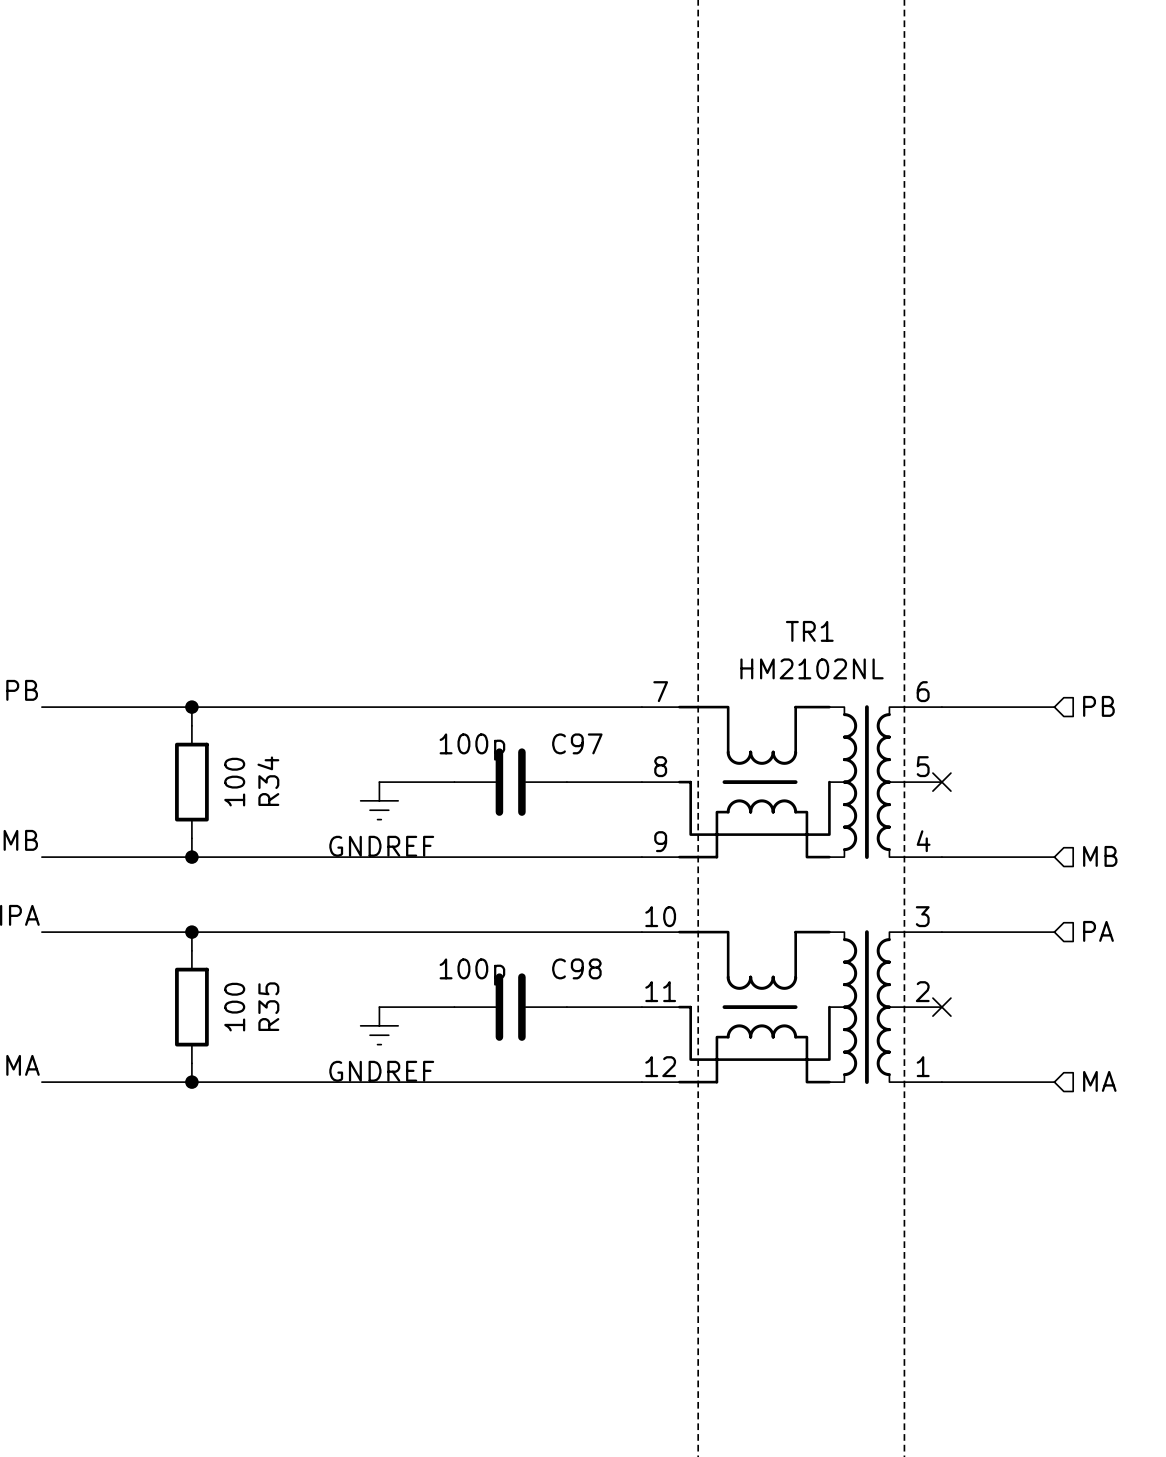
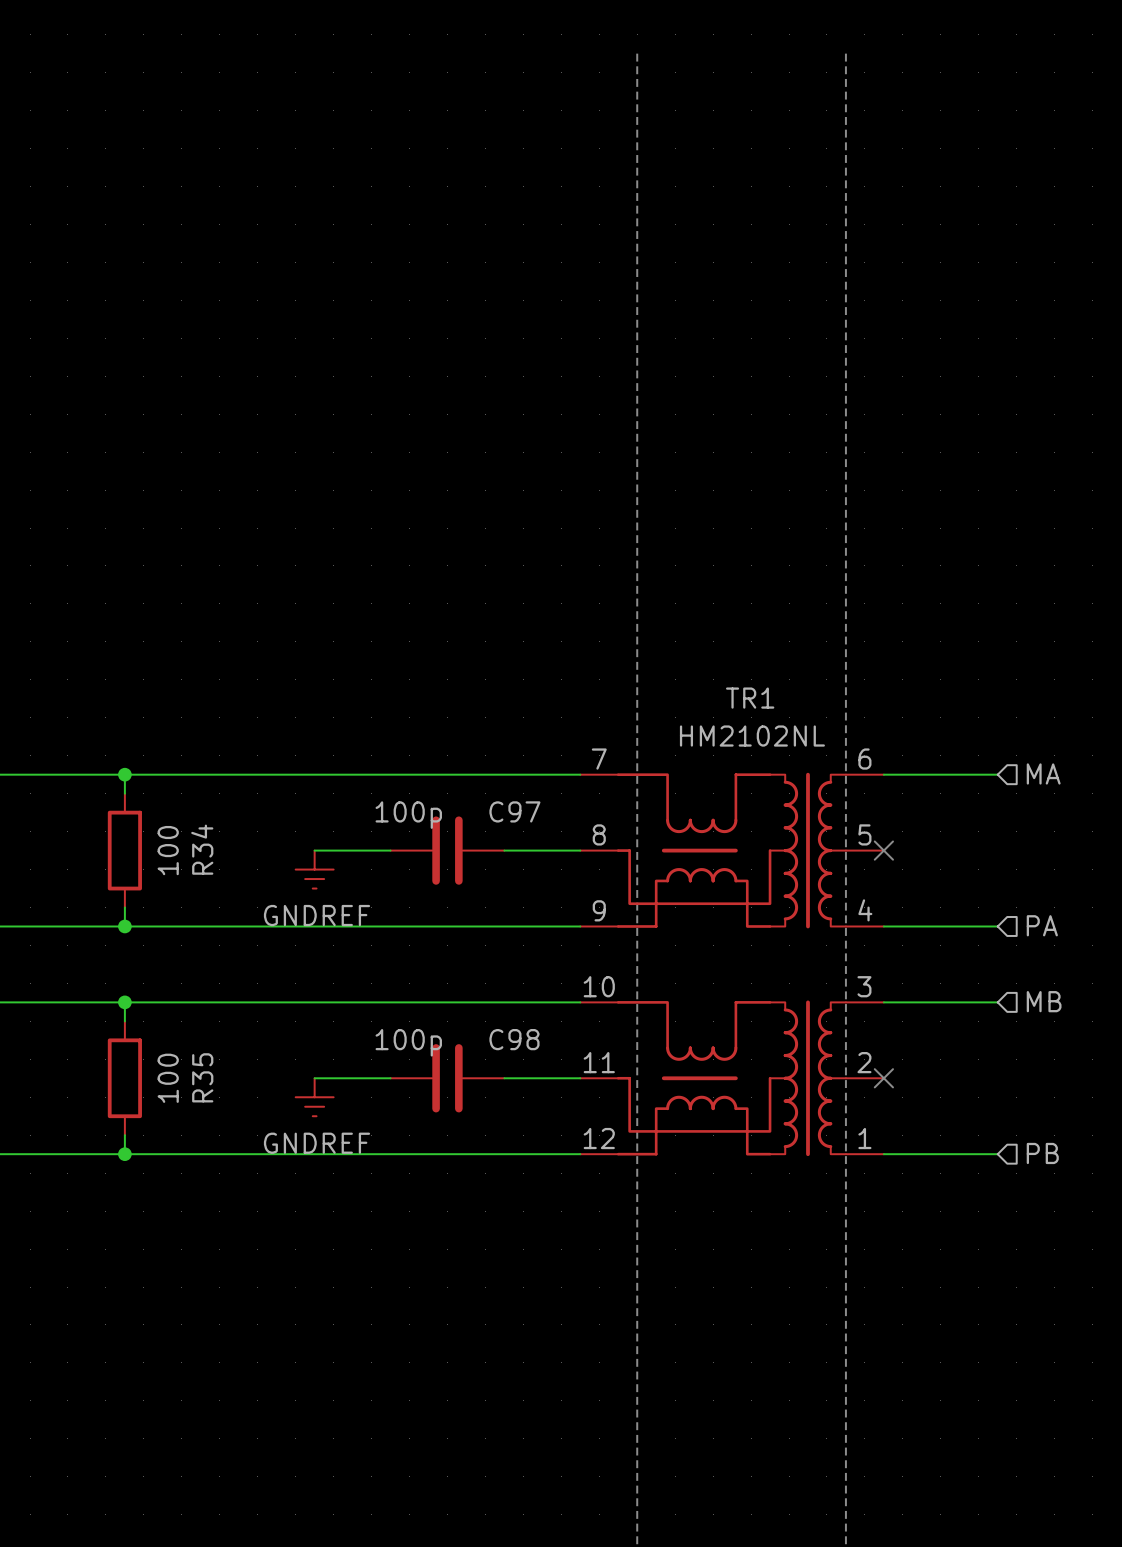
hierarchical label: PB (1098, 706) -> MA (1043, 773)
hierarchical label: MB (1100, 856) -> PA (1042, 925)
hierarchical label: PA (1098, 931) -> MB (1044, 1001)
hierarchical label: MA (1099, 1081) -> PB (1042, 1153)

